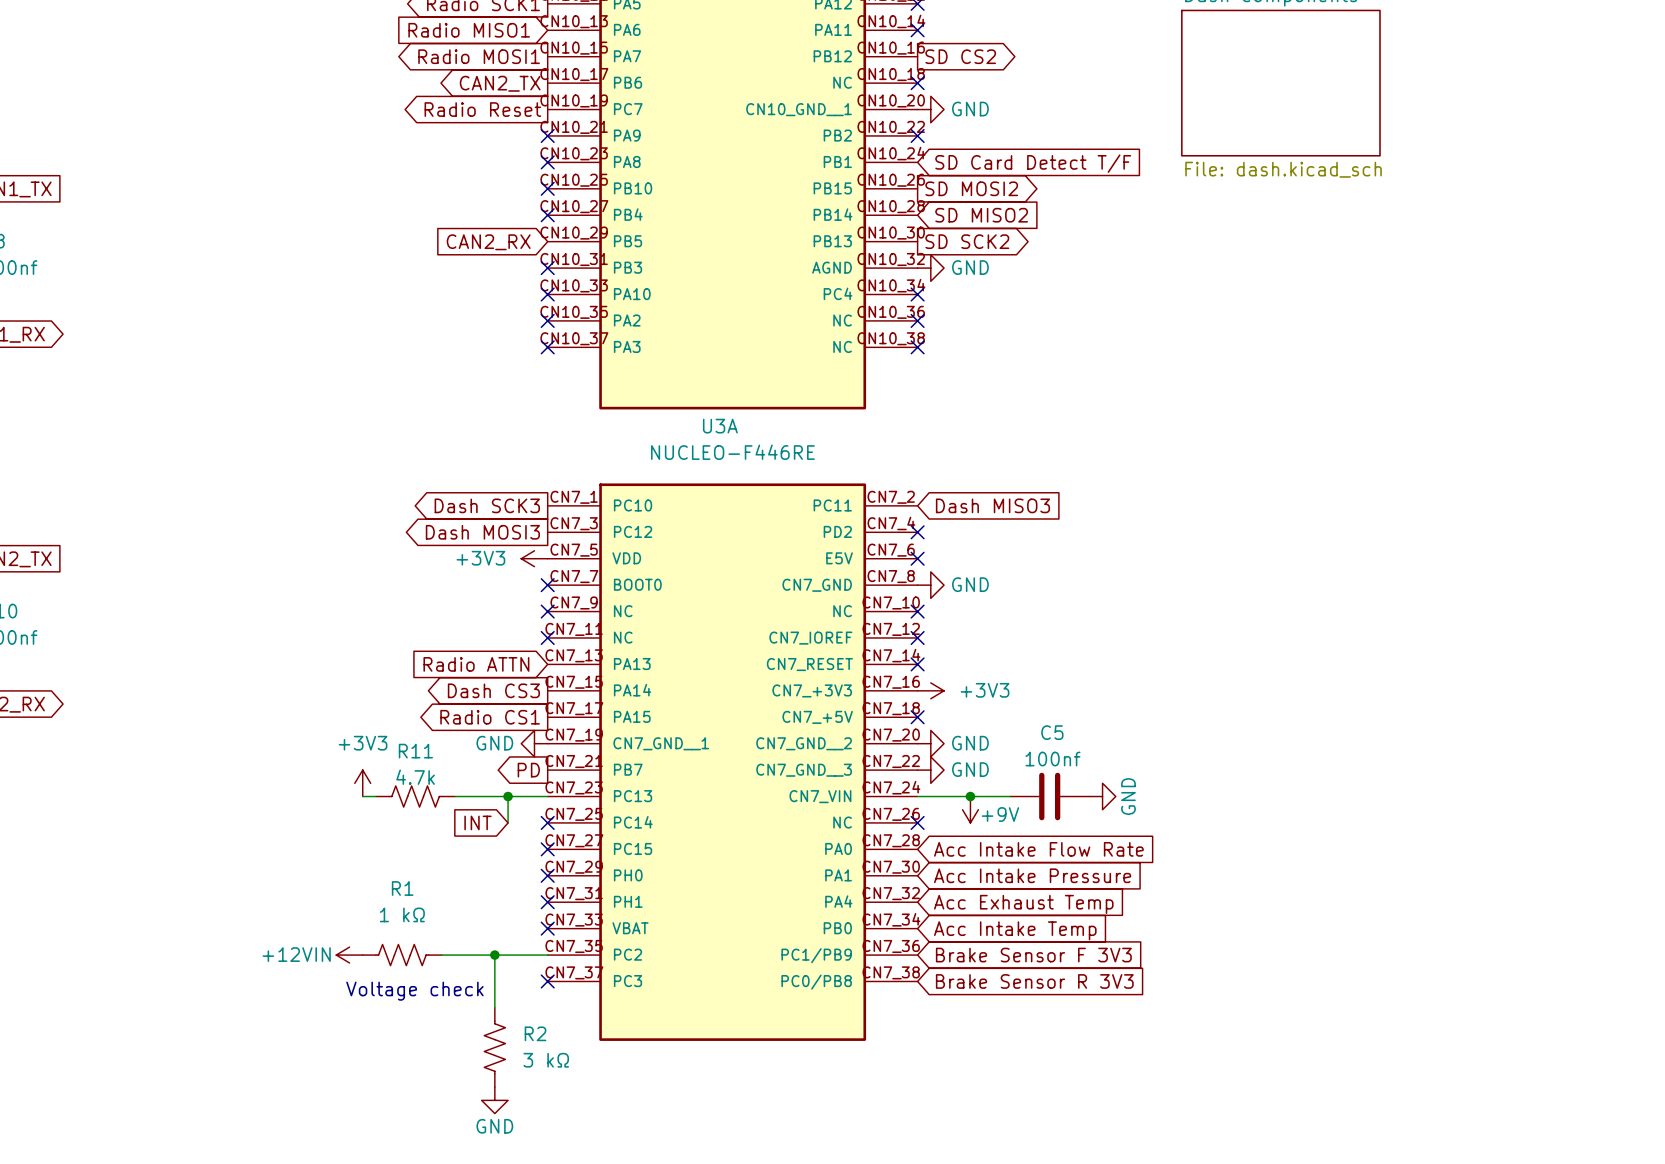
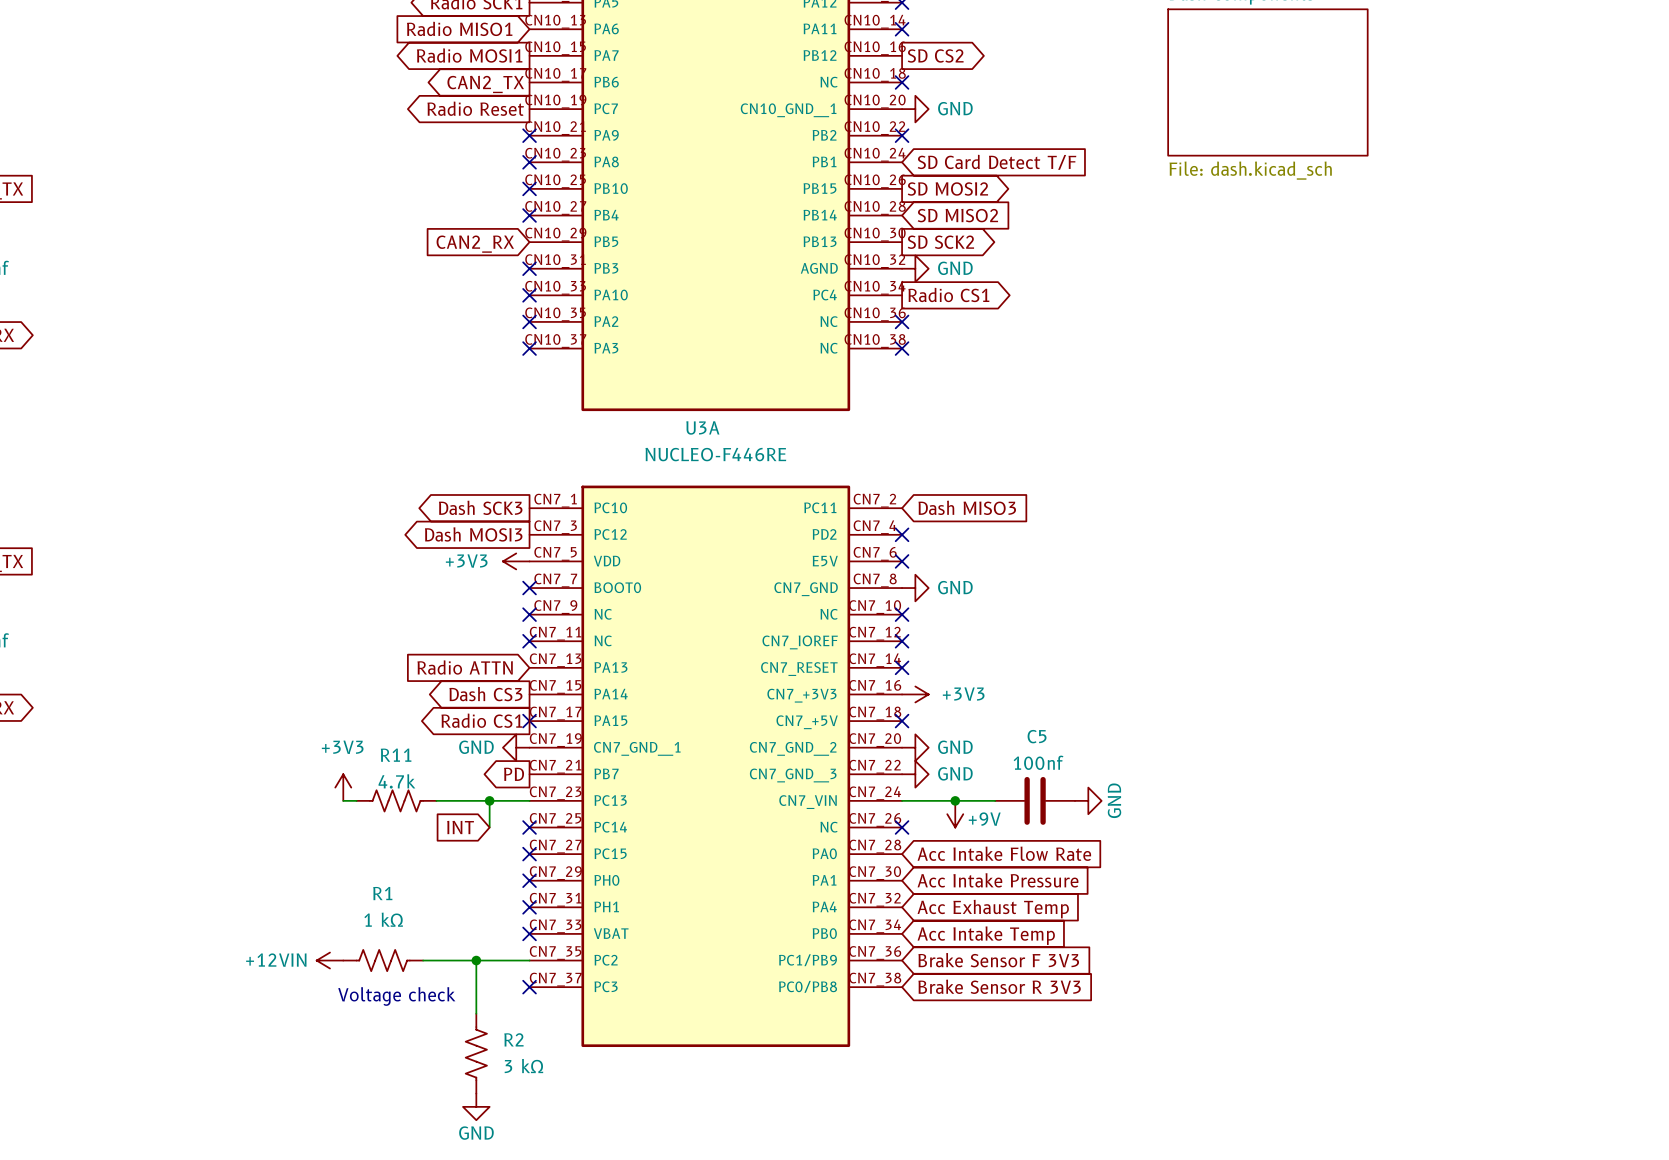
no-connect mark: (917, 294) -> none
global label: none -> Radio CS1 (948, 294)
no-connect mark: none -> (529, 721)

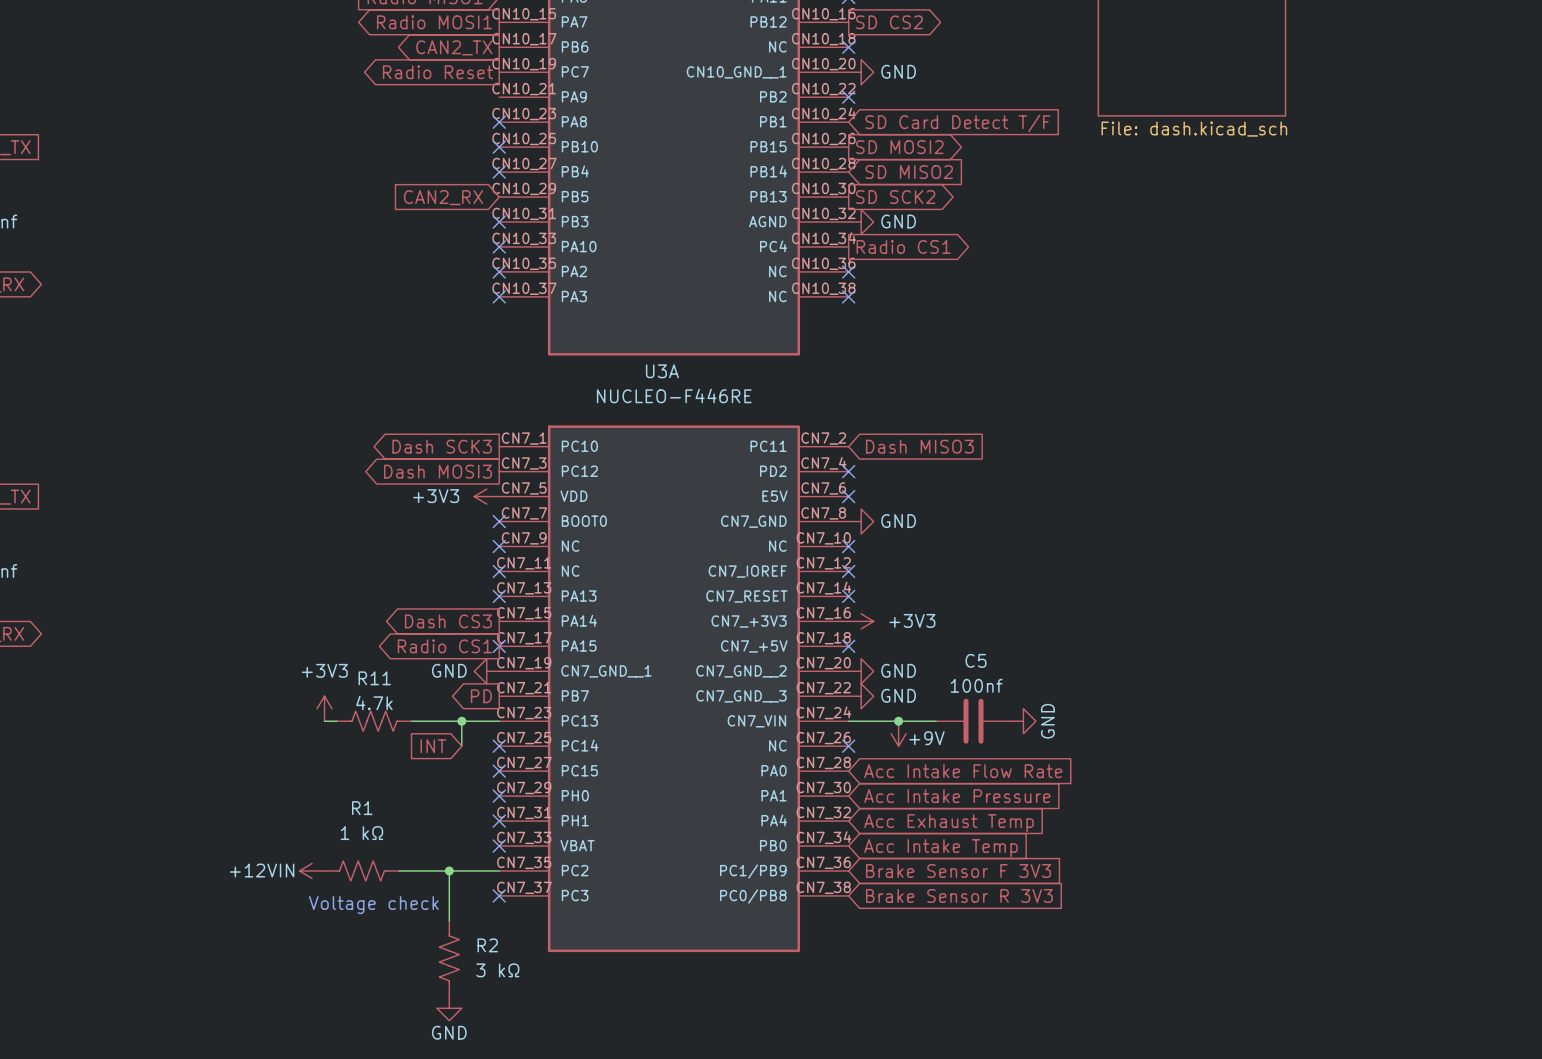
no-connect mark: (529, 135) -> none
global label: Radio ATTN (465, 667) -> none
no-connect mark: none -> (499, 596)

